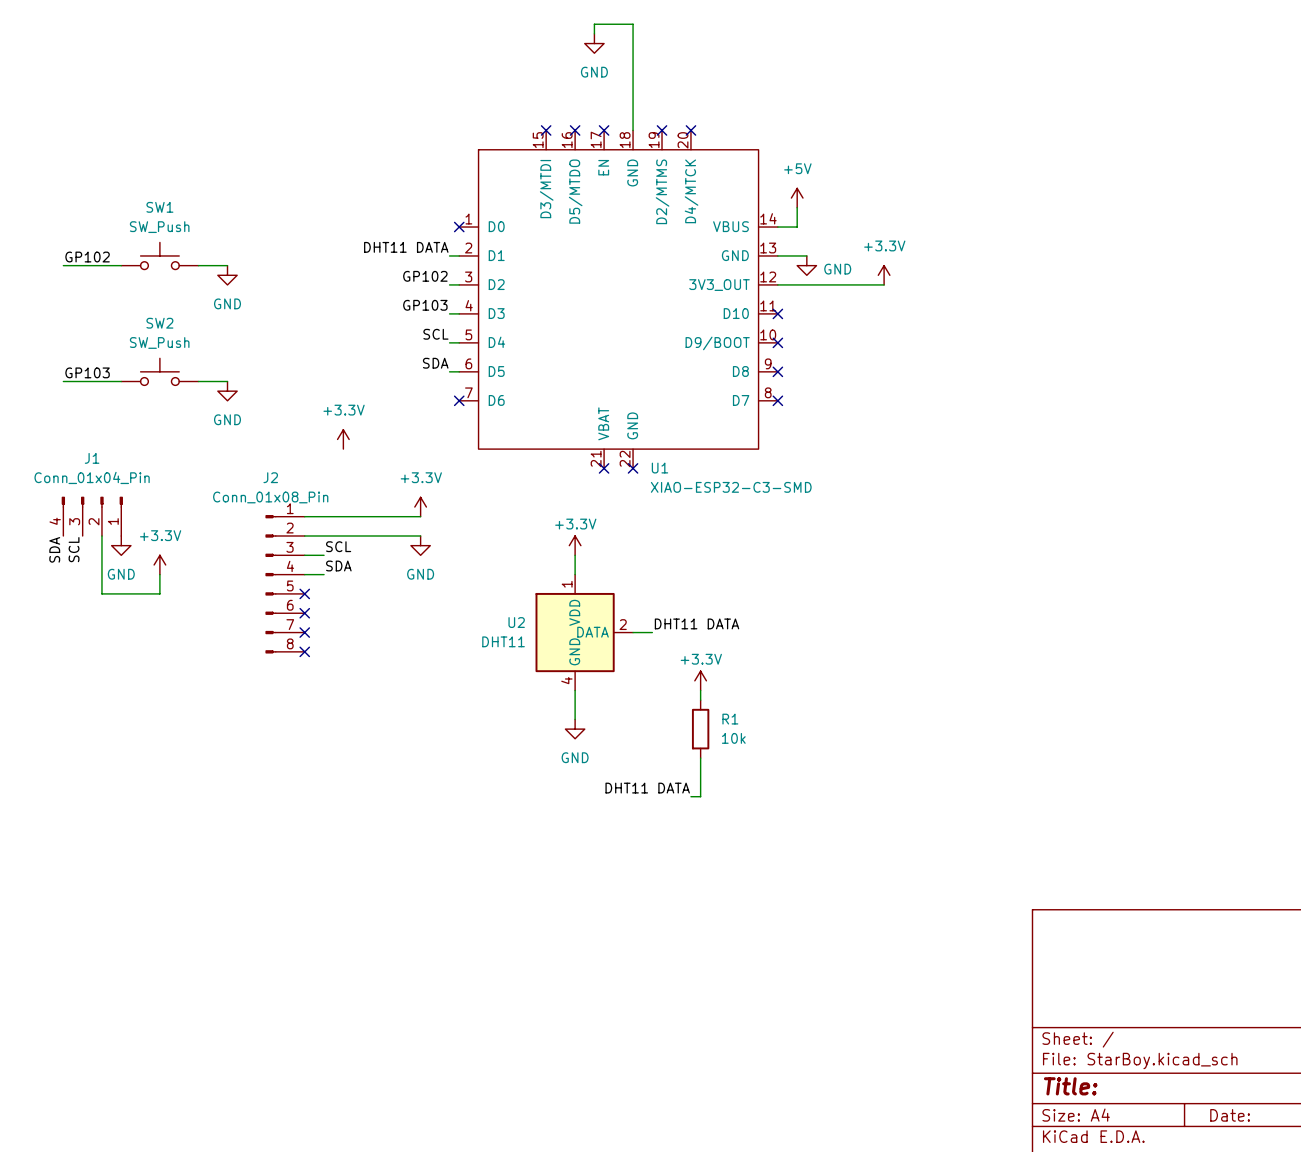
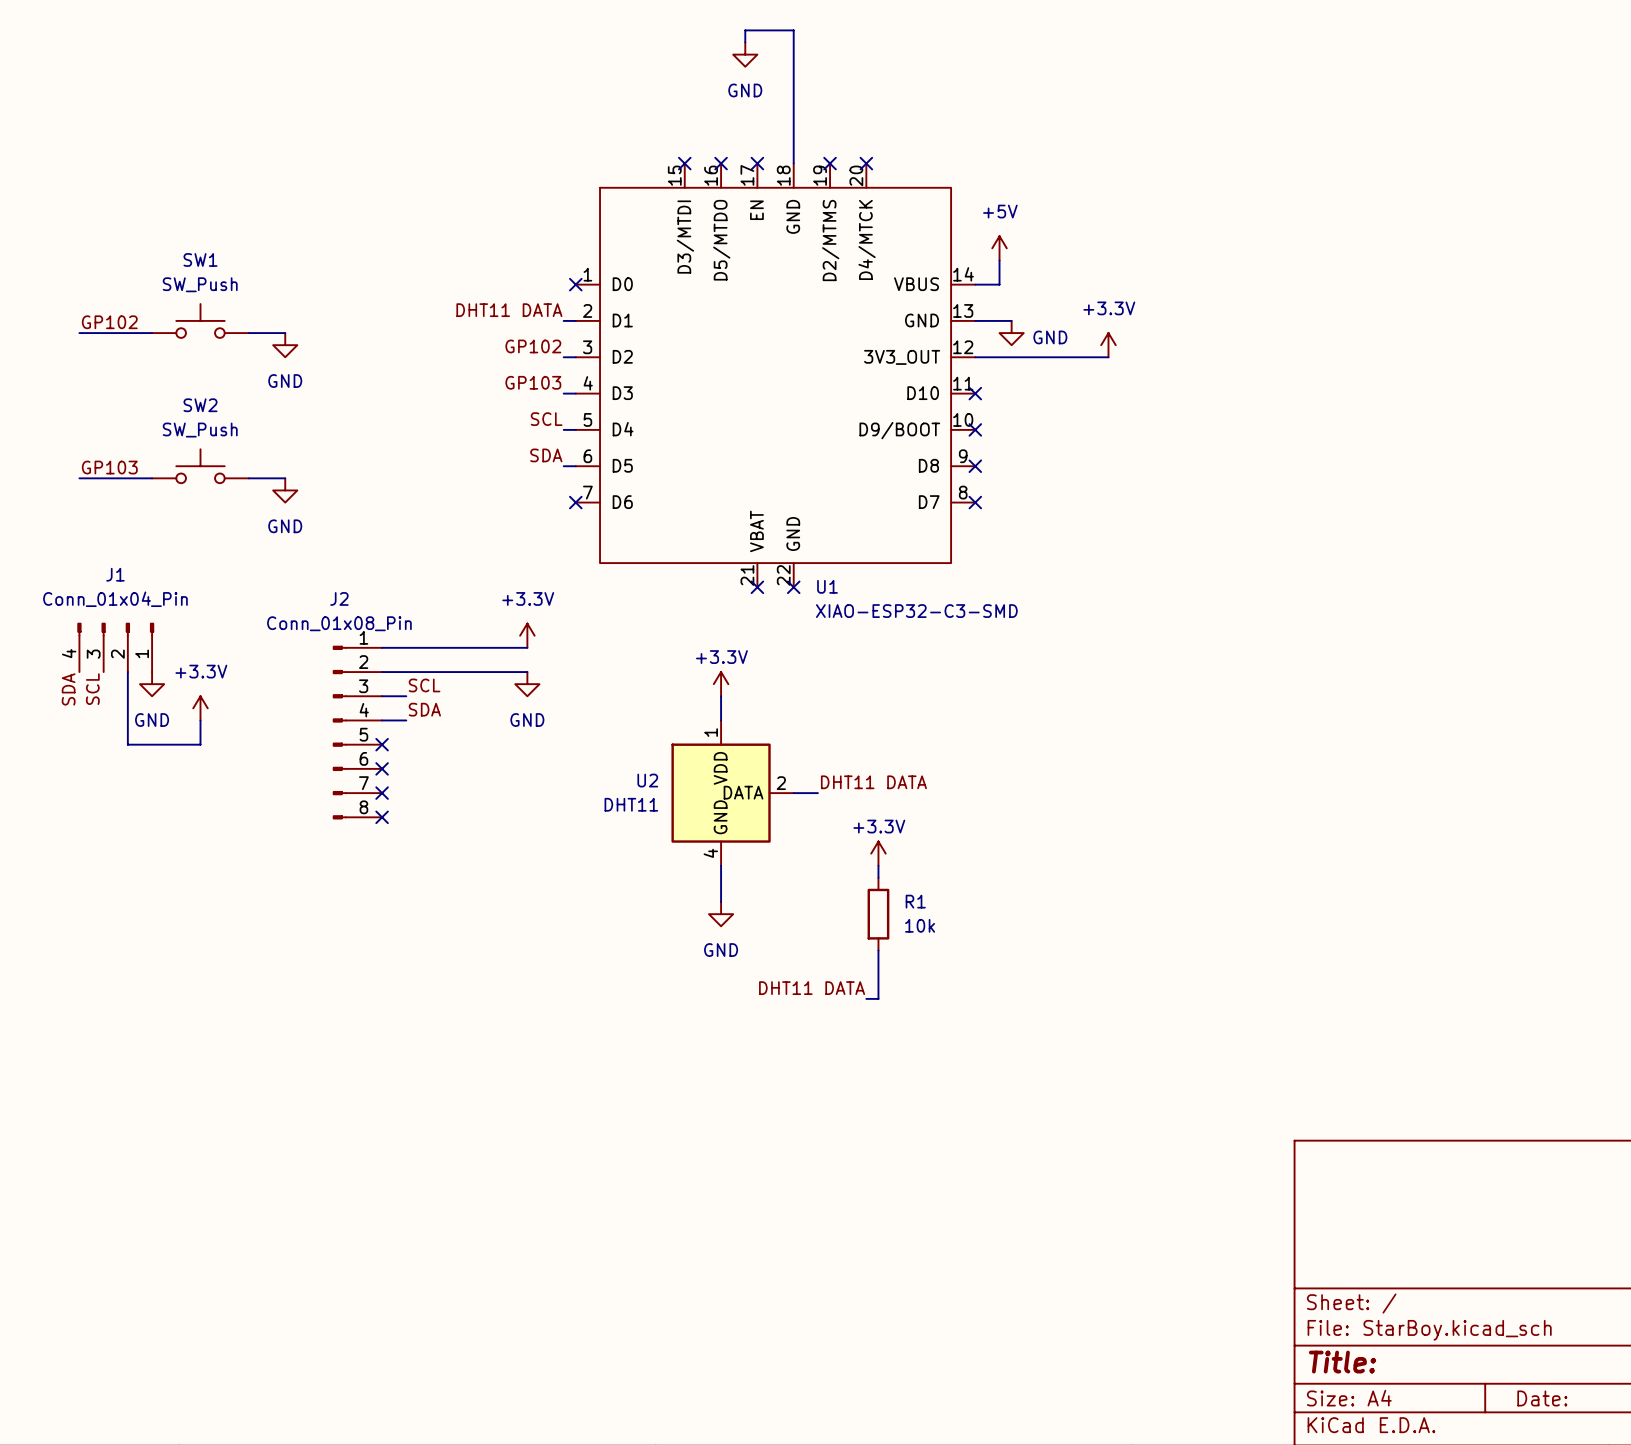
power symbol: +3.3V (343, 439) -> none

